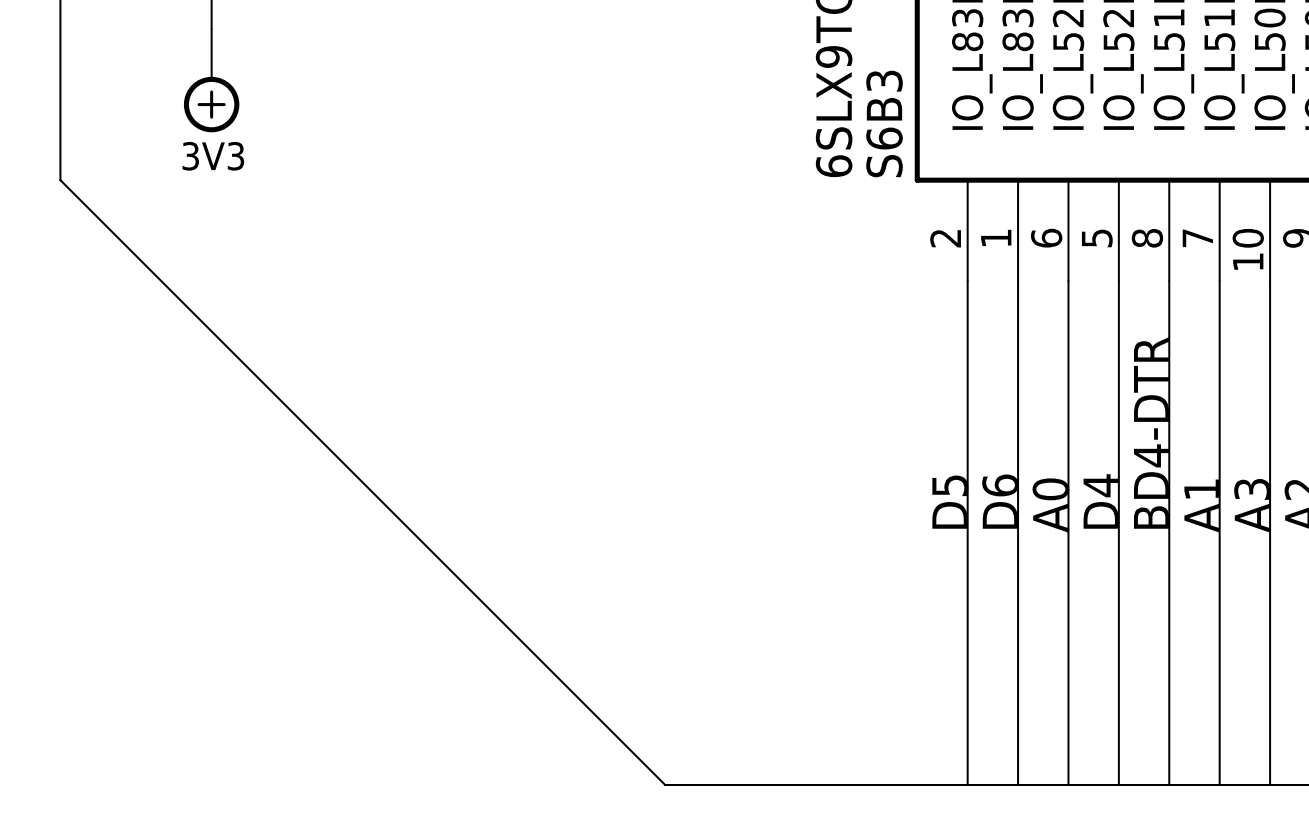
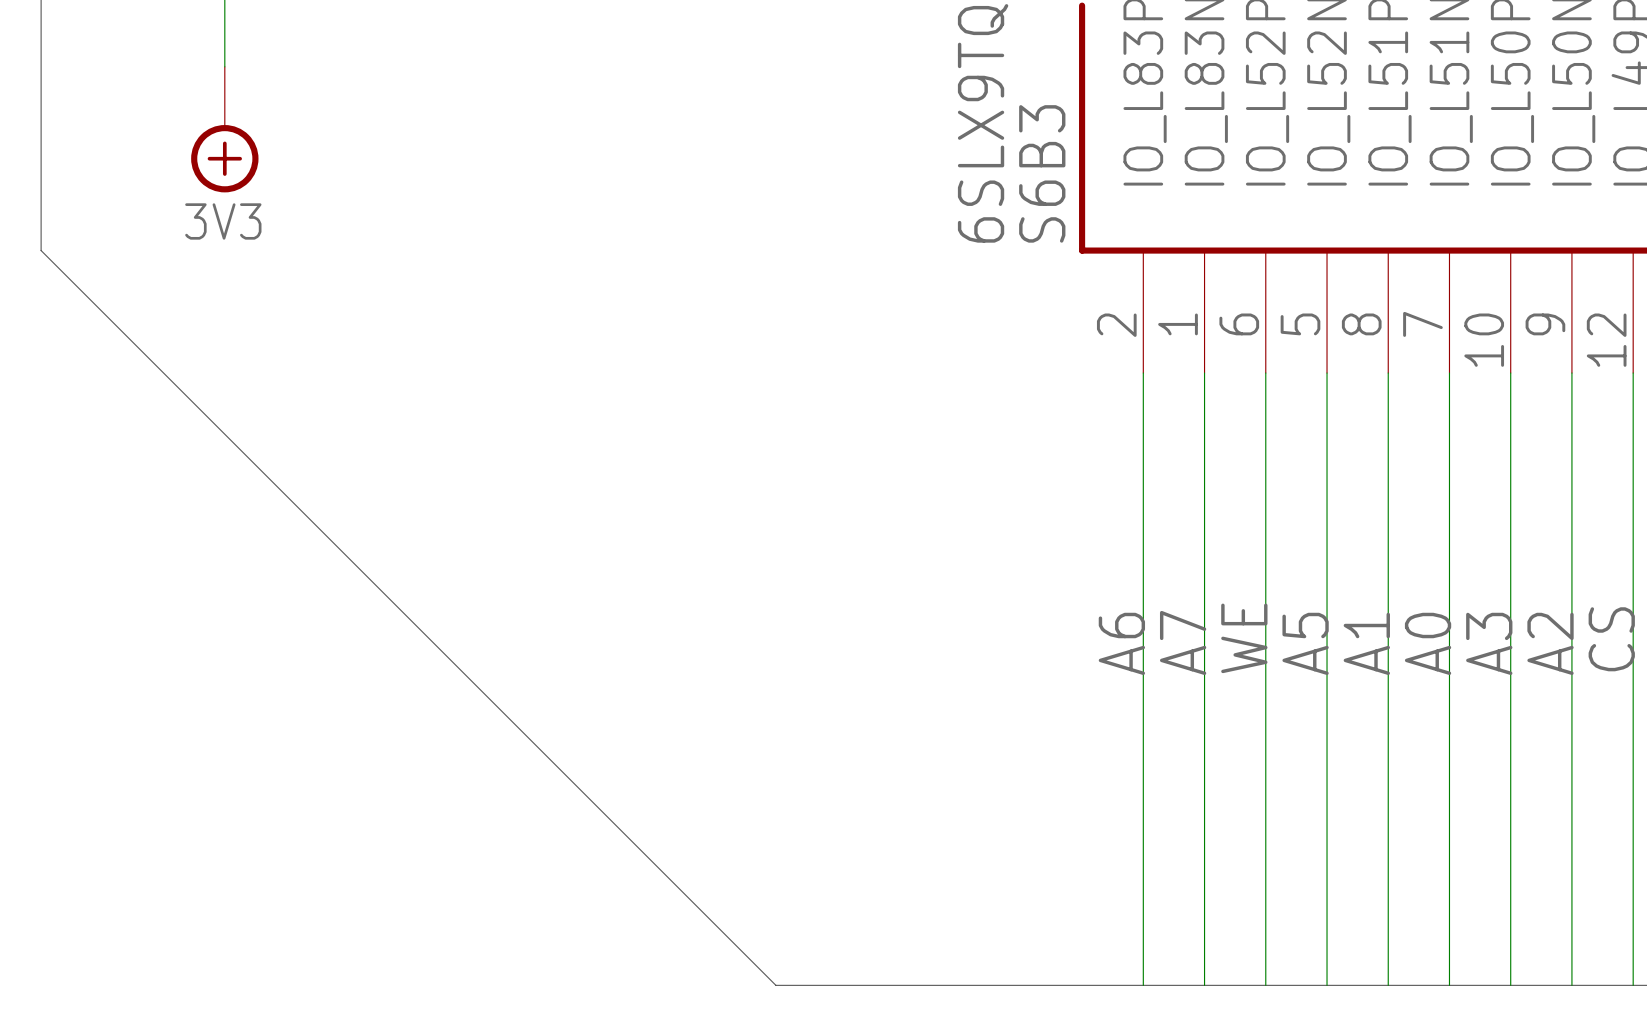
label: BD4-DTR (1151, 432) -> A1 (1366, 643)
label: D6 (1000, 501) -> A7 (1183, 642)
label: D4 (1101, 501) -> A5 (1305, 643)
label: D5 (950, 502) -> A6 (1121, 643)
label: A0 (1050, 505) -> WE (1244, 638)
label: A1 (1202, 506) -> A0 (1428, 643)

